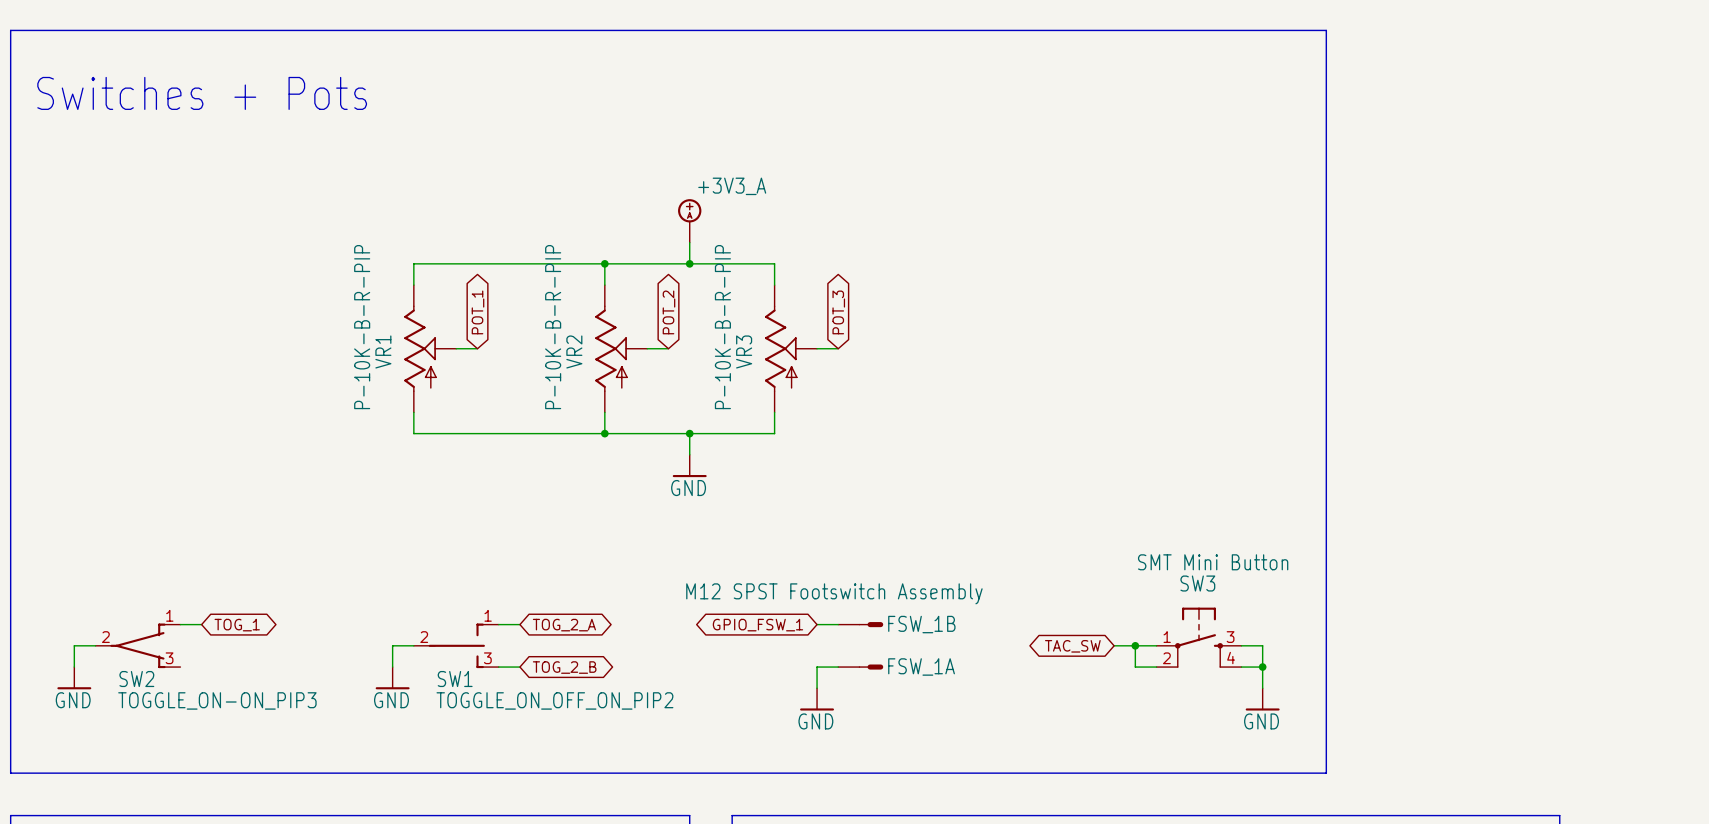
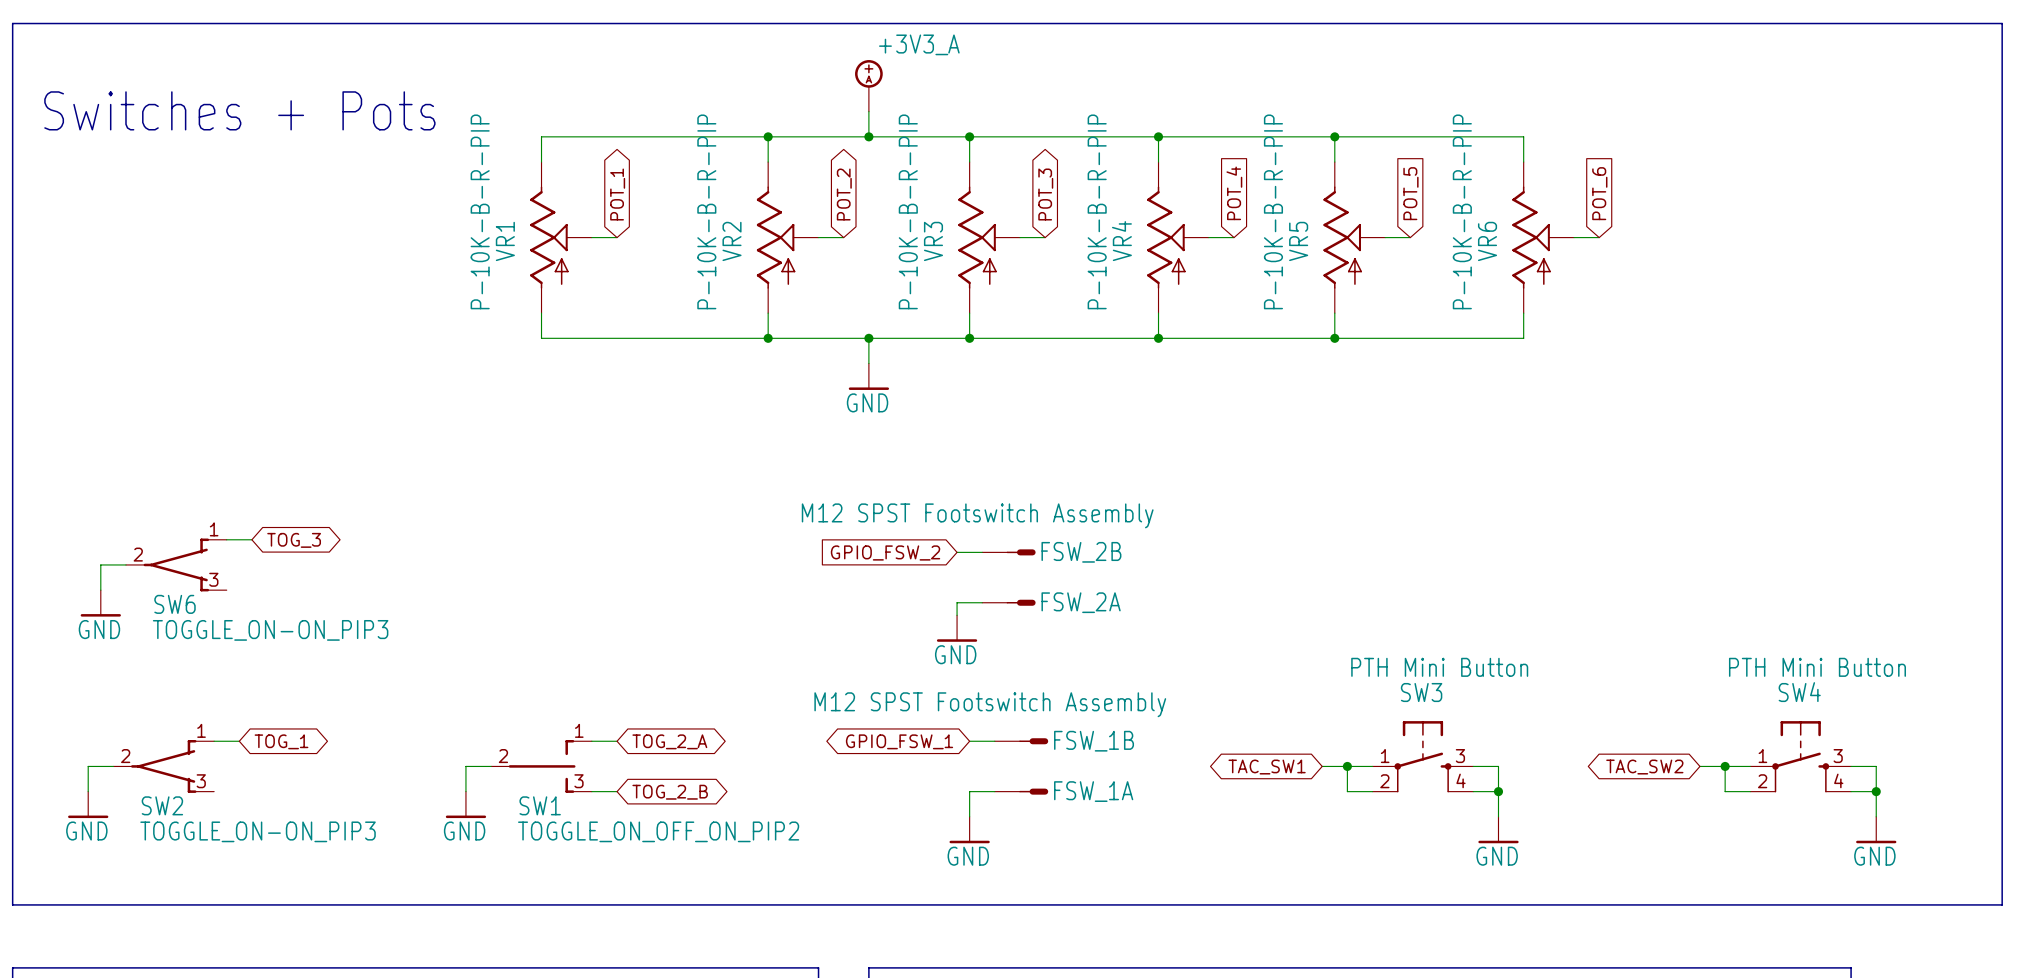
line: (10, 30) (1326, 30) (1326, 773) (10, 773) (10, 762) -> (12, 36) (12, 23) (2002, 23) (2002, 904) (12, 904)
junction: none -> (768, 136)
junction: none -> (868, 136)
wire: none -> (969, 136) (969, 162)
junction: none -> (969, 136)
wire: none -> (1158, 136) (1158, 162)
junction: none -> (1158, 136)
wire: none -> (1334, 136) (1334, 162)
junction: none -> (1334, 136)
wire: none -> (541, 162) (541, 136) (1523, 136) (1523, 162)
global label: none -> POT_4 (1234, 193)
global label: none -> POT_5 (1410, 193)
global label: none -> POT_6 (1599, 193)
VR4: none -> P-10K-B-R-PIP (1178, 237)
wire: none -> (1208, 237) (1234, 237)
VR5: none -> P-10K-B-R-PIP (1354, 237)
wire: none -> (1385, 237) (1410, 237)
VR6: none -> P-10K-B-R-PIP (1543, 237)
wire: none -> (1574, 237) (1599, 237)
power symbol position: +3V3_A (689, 220) -> +3V3_A (868, 85)
wire: (689, 242) (689, 263) -> (868, 111) (868, 136)
wire: none -> (541, 313) (541, 338) (1523, 338) (1523, 313)
wire: (604, 263) (604, 285) -> (768, 136) (768, 162)
junction: (604, 263) -> none
junction: (689, 263) -> none
wire: none -> (969, 313) (969, 338)
wire: none -> (1158, 313) (1158, 338)
wire: none -> (1334, 313) (1334, 338)
wire: (413, 285) (413, 263) (774, 263) (774, 285) -> none
junction: none -> (768, 338)
junction: none -> (868, 338)
junction: none -> (969, 338)
junction: none -> (1158, 338)
junction: none -> (1334, 338)
global label position: POT_1 (478, 312) -> POT_1 (617, 194)
global label position: POT_2 (668, 312) -> POT_2 (844, 194)
global label position: POT_3 (838, 312) -> POT_3 (1045, 194)
power symbol: none -> GND (868, 376)
VR1 position: (430, 348) -> (561, 237)
wire: (456, 348) (477, 348) -> (591, 237) (617, 237)
VR2 position: (621, 348) -> (787, 237)
wire: (647, 348) (668, 348) -> (818, 237) (843, 237)
VR3 position: (791, 348) -> (989, 237)
wire: (817, 348) (838, 348) -> (1020, 237) (1045, 237)
wire: (413, 412) (413, 433) (774, 433) (774, 412) -> none
wire: (604, 412) (604, 433) -> (768, 313) (768, 338)
junction: (604, 433) -> none
wire: (689, 433) (689, 454) -> (868, 338) (868, 363)
junction: (689, 433) -> none
wire: none -> (226, 539) (251, 539)
global label: none -> TOG_3 (294, 540)
power symbol: GND (689, 465) -> none
global label: none -> GPIO_FSW_2 (885, 552)
wire: none -> (957, 552) (982, 552)
FSW_2B: none -> M12 SPST Footswitch Assembly (1008, 552)
wire: none -> (125, 564) (100, 564) (100, 590)
SW6: none -> TOGGLE_ON-ON_PIP3 (176, 564)
wire: none -> (982, 602) (957, 602) (957, 615)
FSW_2A: none -> (1008, 602)
power symbol: none -> GND (100, 603)
power symbol: none -> GND (957, 628)
SW3 value: SMT Mini Button (1213, 562) -> PTH Mini Button (1439, 667)
SW4: none -> PTH Mini Button (1800, 756)
wire: none -> (1699, 766) (1750, 766)
wire: none -> (1725, 766) (1725, 791) (1750, 791)
junction: none -> (1725, 766)
wire: none -> (1851, 766) (1876, 766) (1876, 816)
global label: TAC_SW (1072, 646) -> TAC_SW1 (1267, 767)
global label: none -> TAC_SW2 (1644, 767)
wire: none -> (1851, 791) (1876, 791)
junction: none -> (1876, 791)
power symbol: none -> GND (1876, 830)

